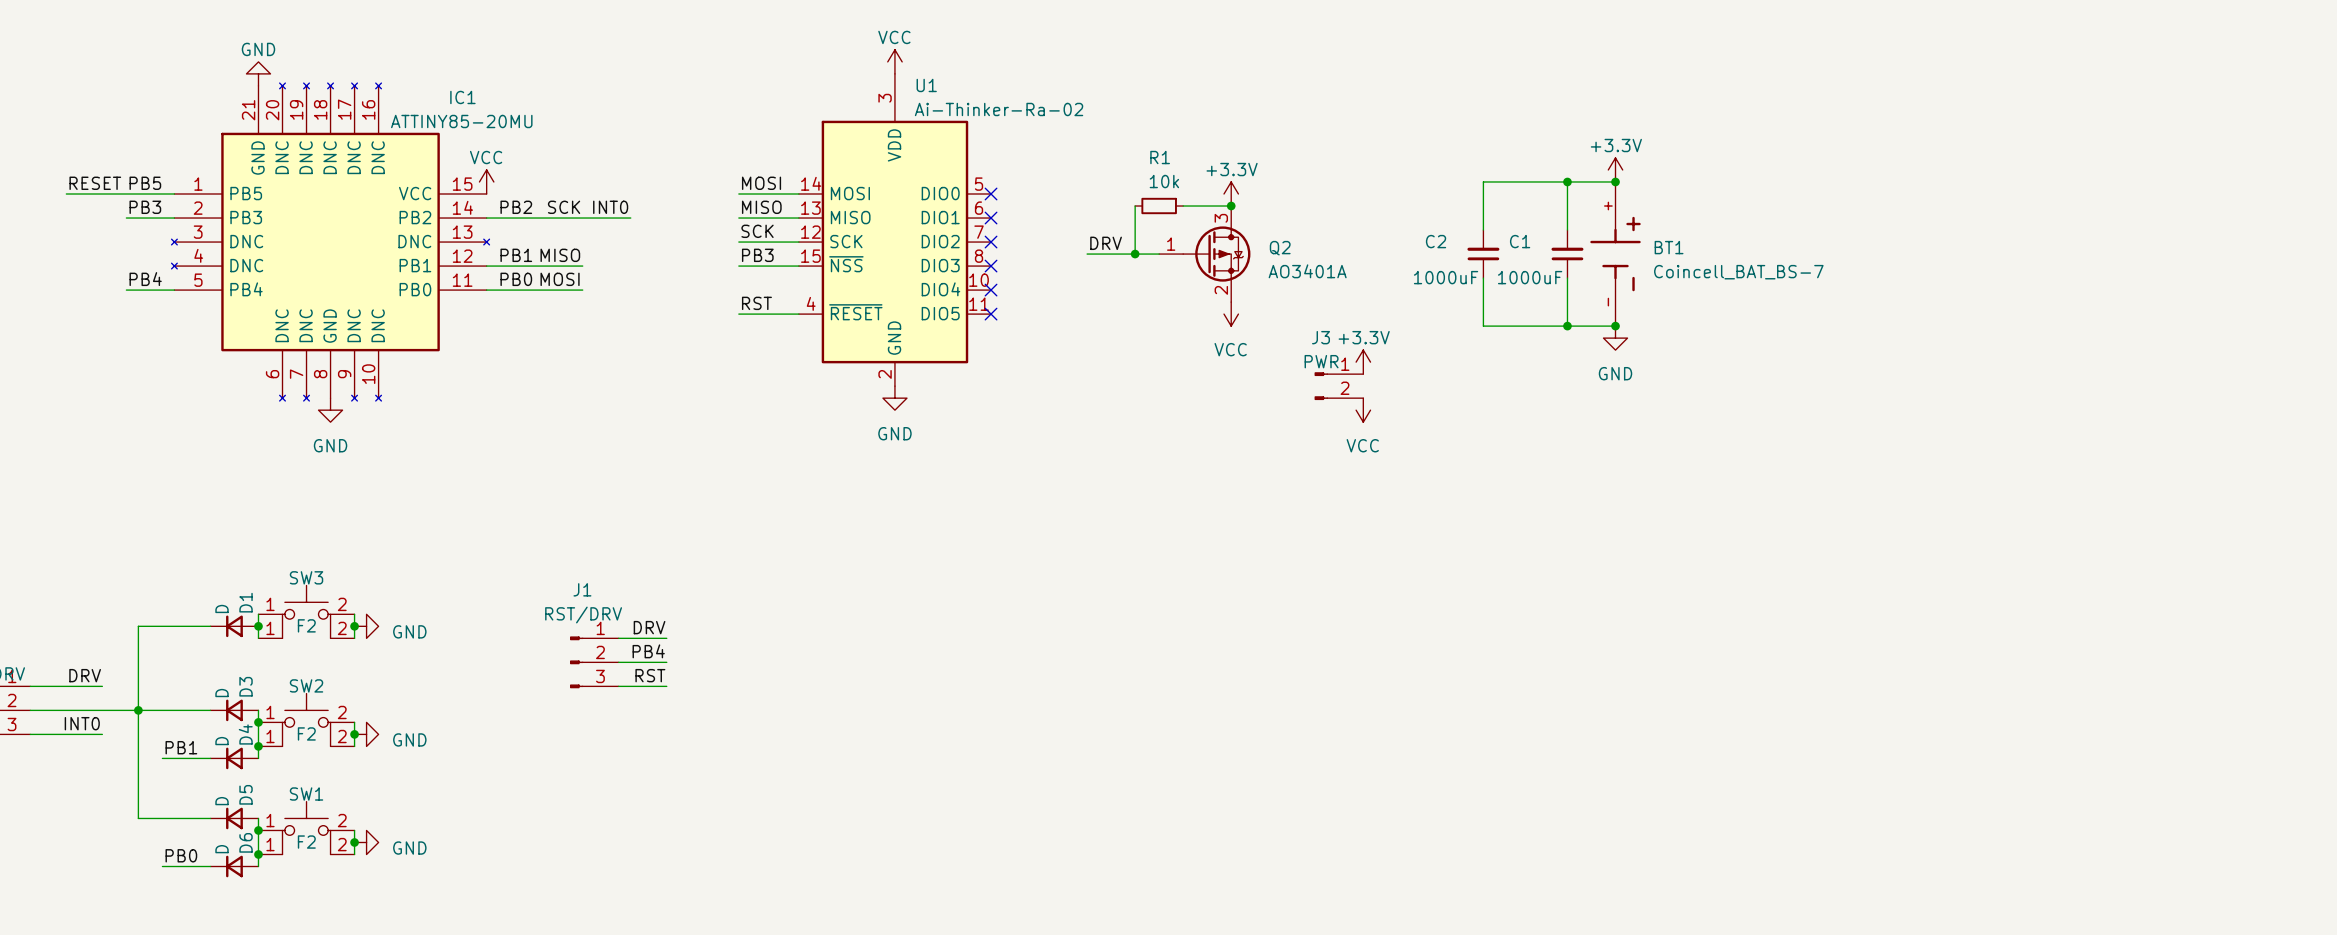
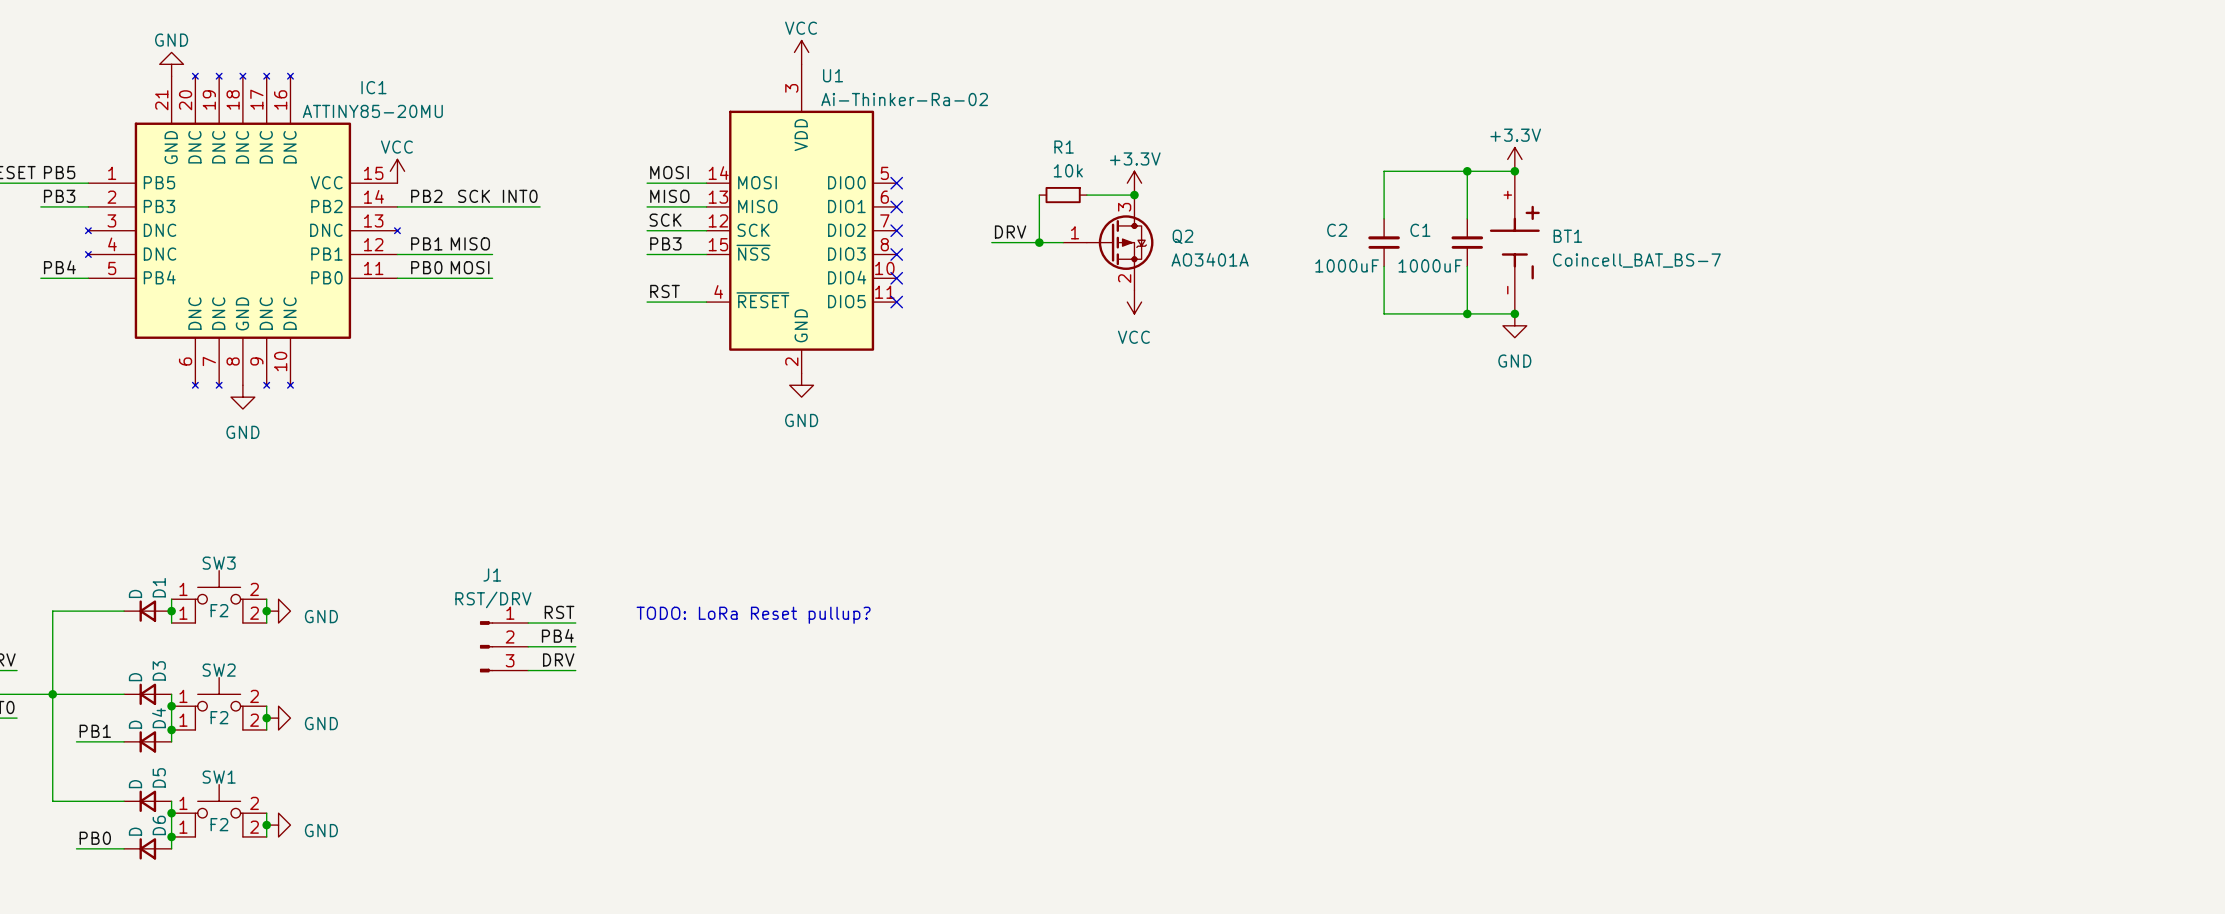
power symbol: +3.3V (1363, 362) -> none
J3: PWR (1338, 386) -> none
power symbol: VCC (1363, 410) -> none
label: DRV (649, 627) -> RST (559, 612)
text: none -> TODO: LoRa Reset pullup? (753, 615)
label: RST (650, 675) -> DRV (558, 659)

